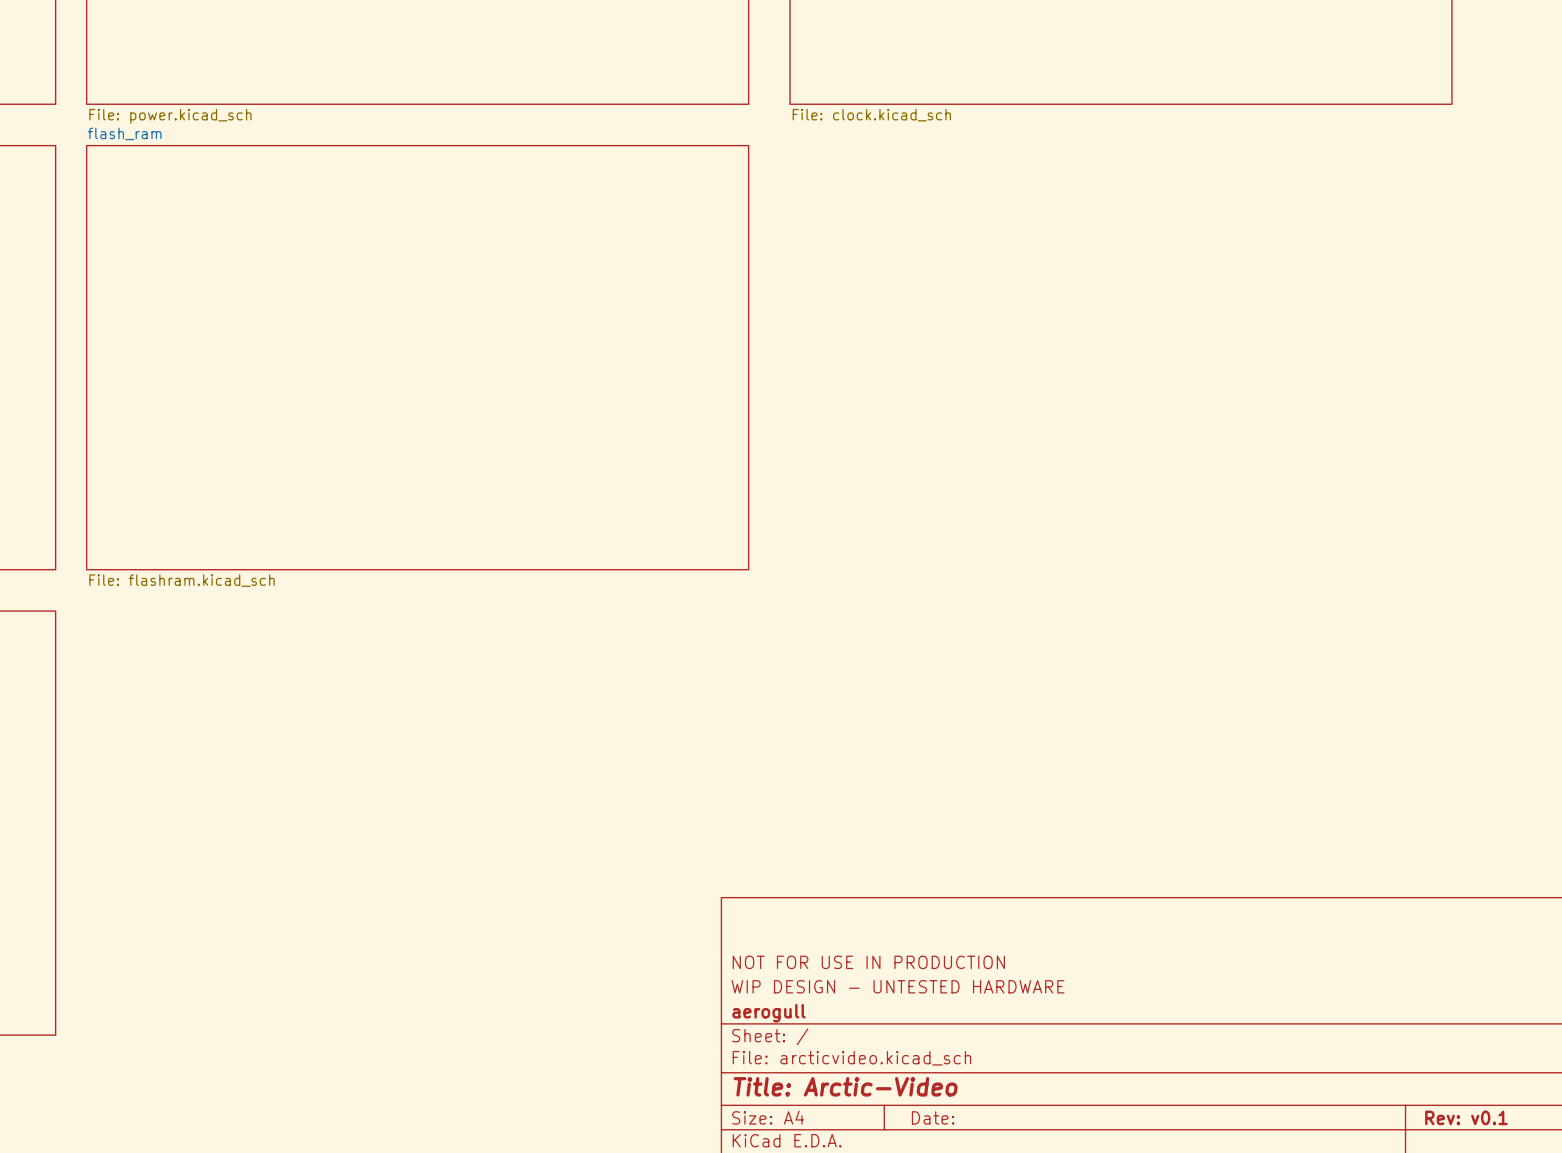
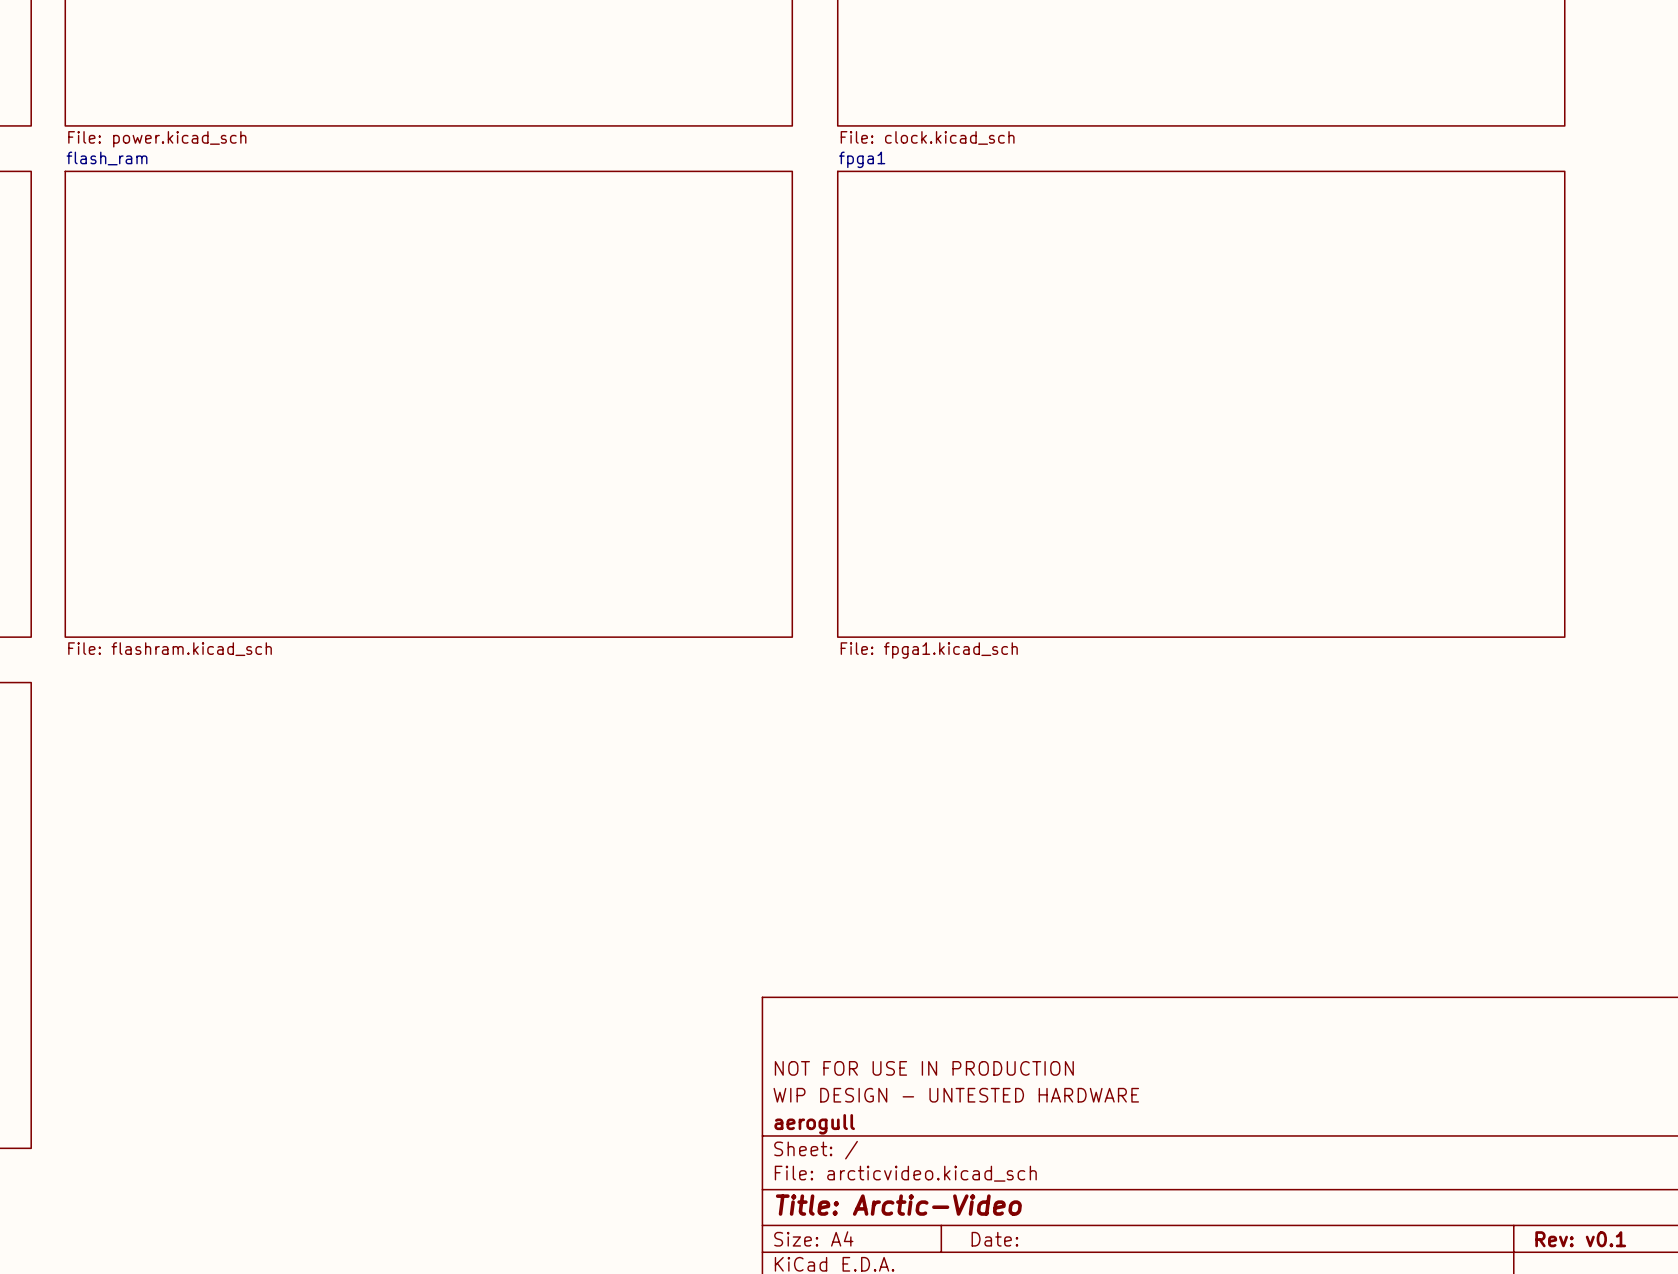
sheet fpga1: none -> File: fpga1.kicad_sch (1201, 404)

